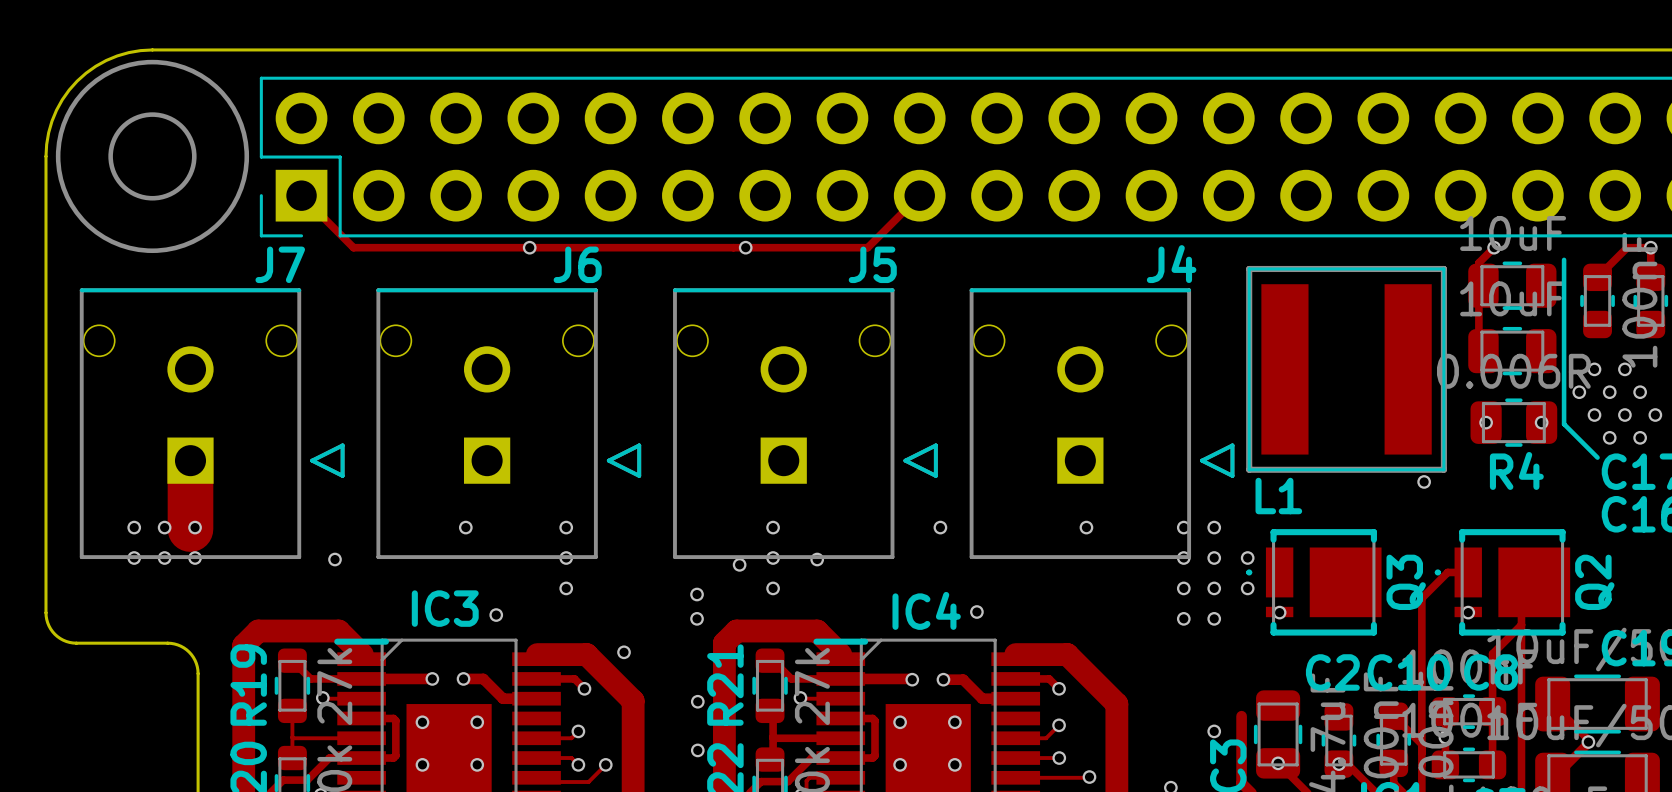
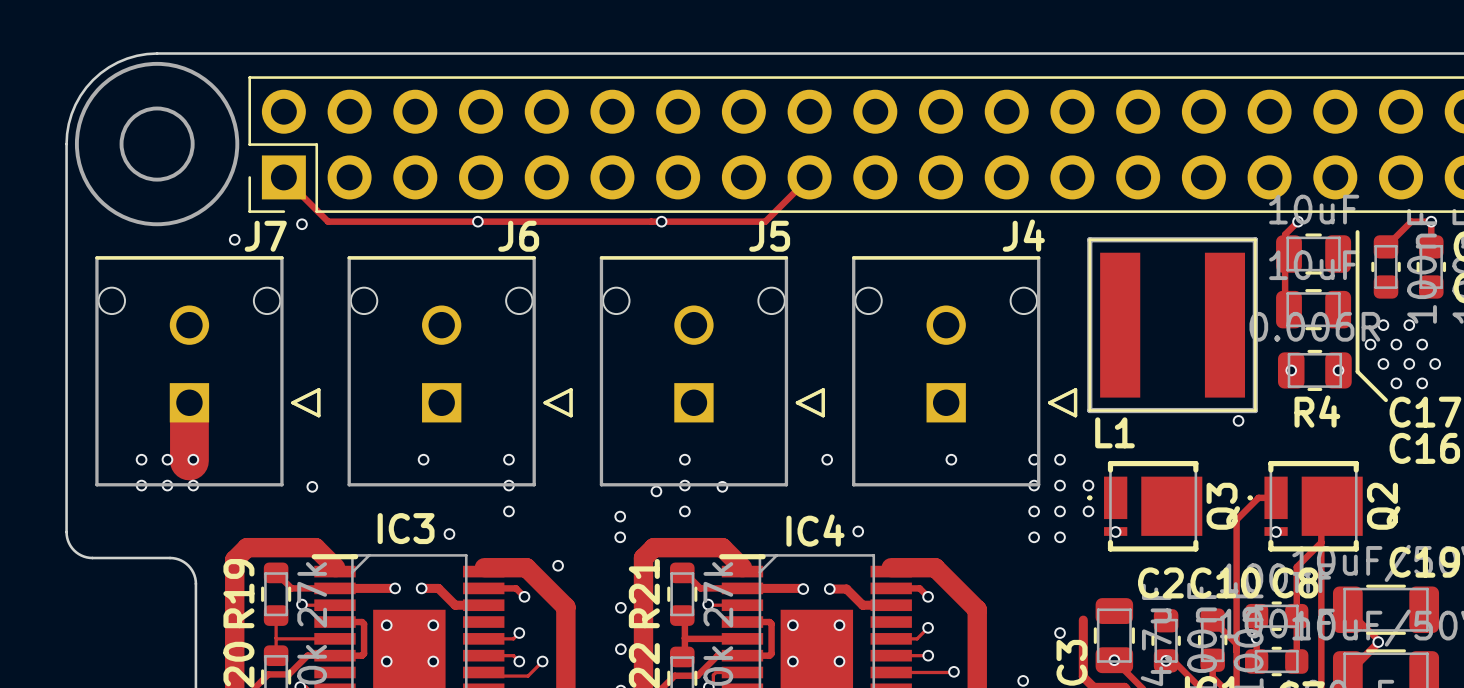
via: none -> (301, 224)
via: none -> (234, 239)

